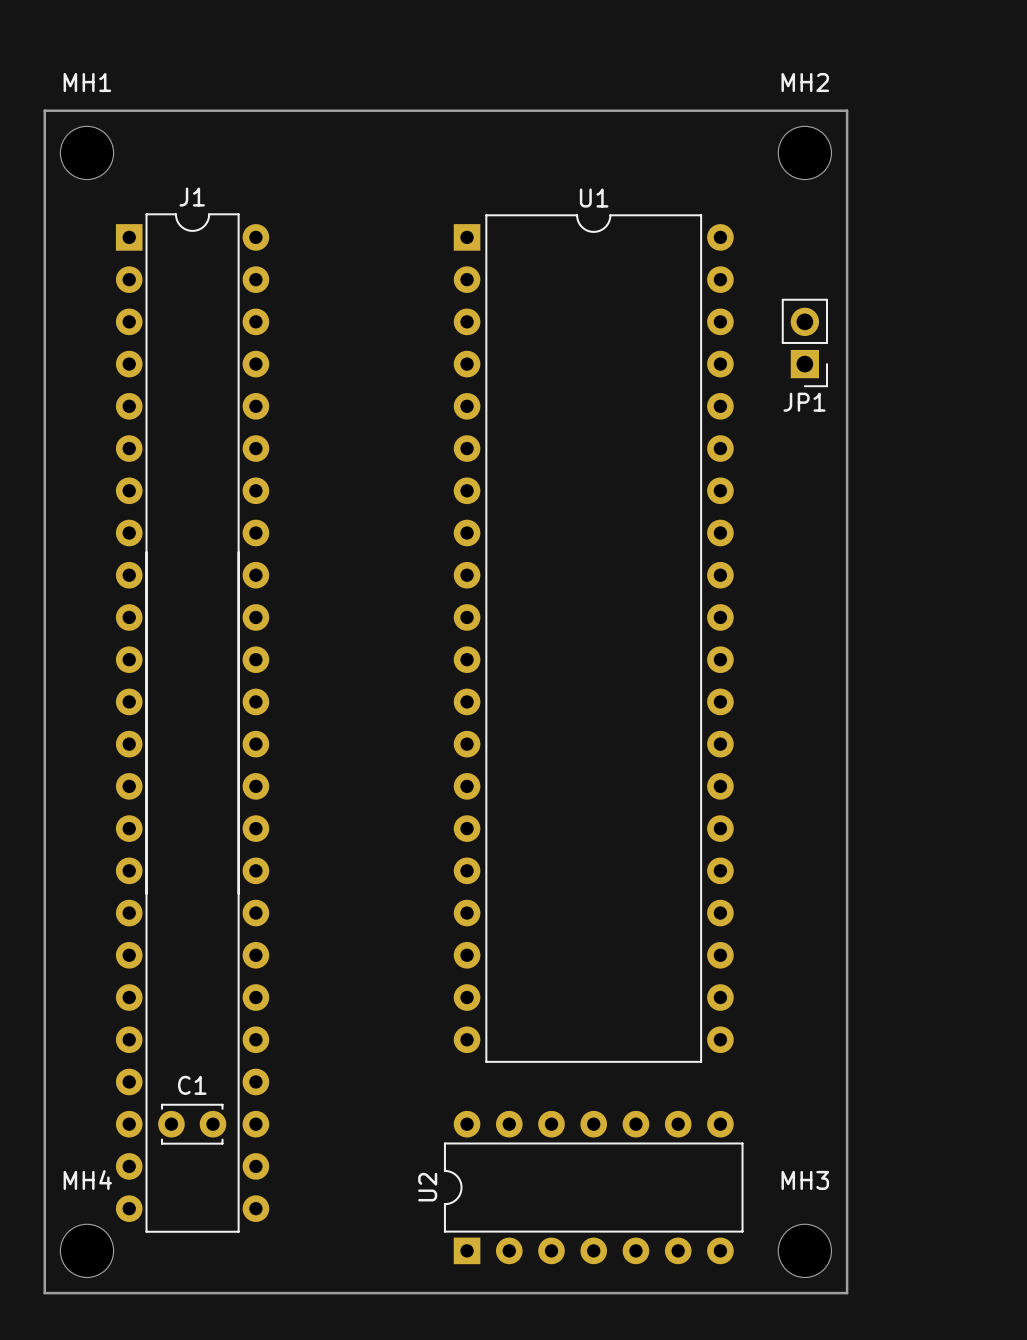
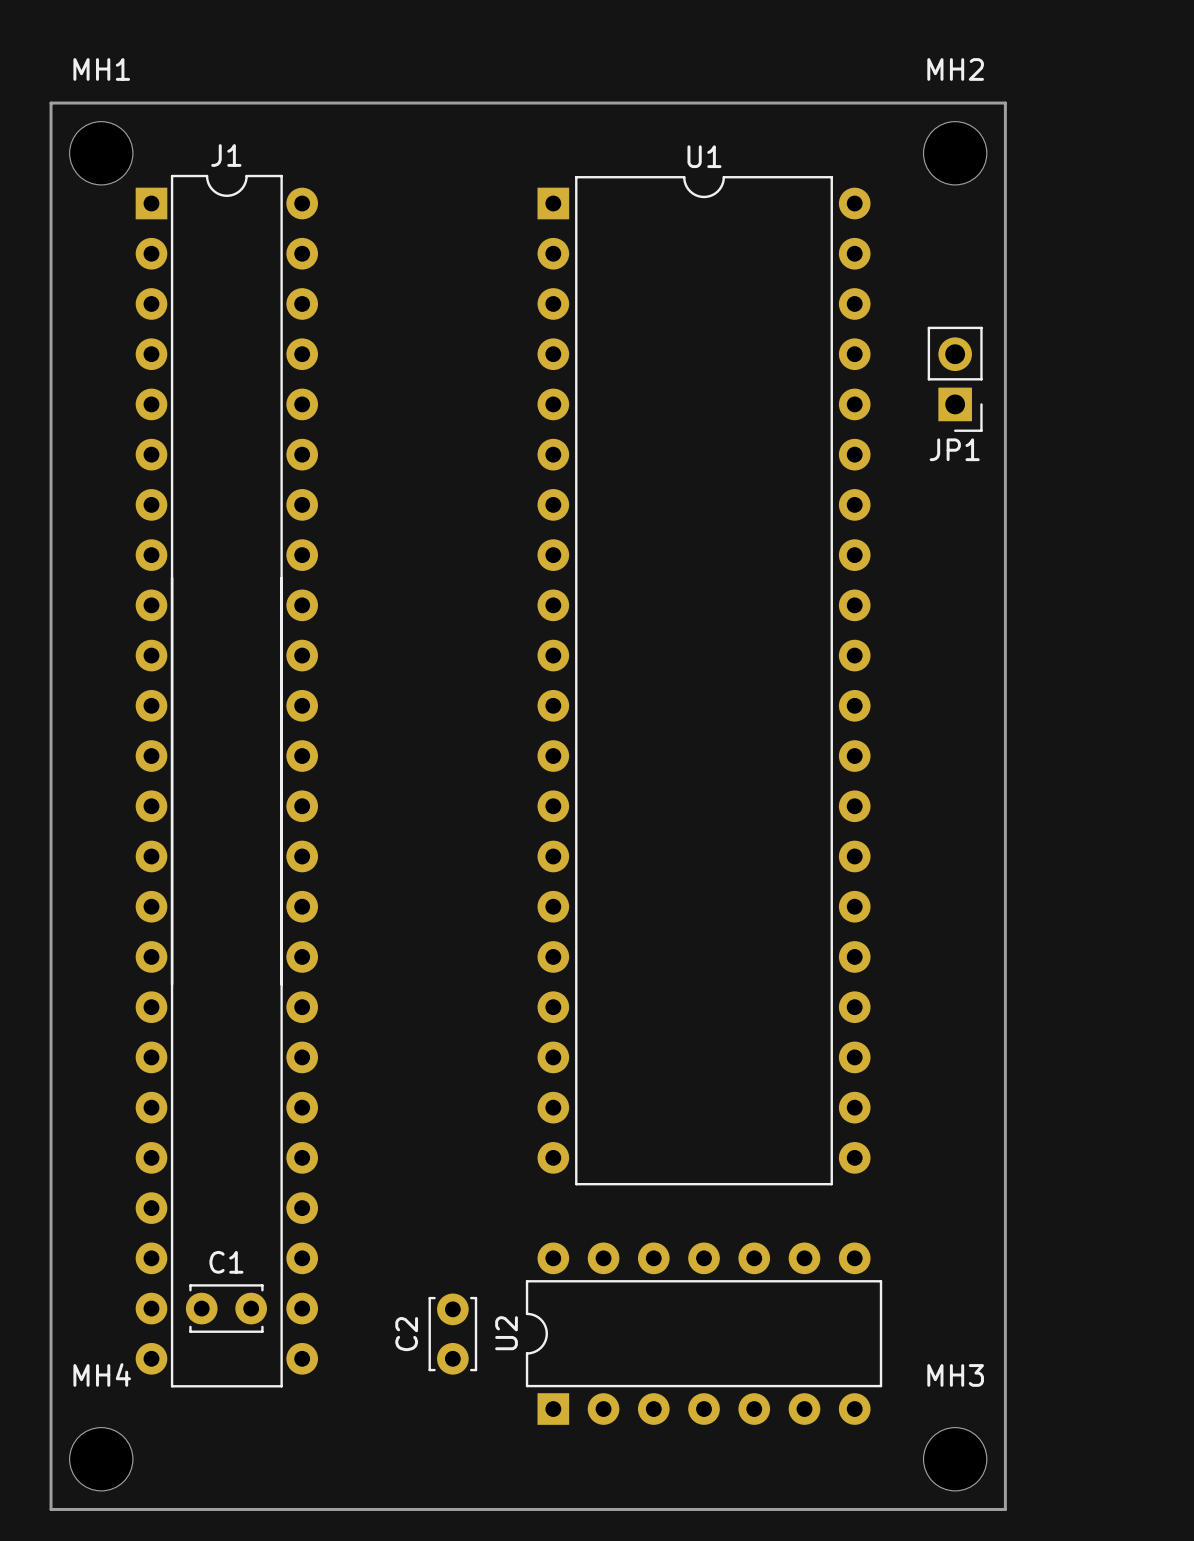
U1 position: (593, 638) -> (704, 680)
J1 position: (192, 723) -> (226, 781)
C2: none -> (452, 1334)
U2 position: (593, 1187) -> (704, 1333)

